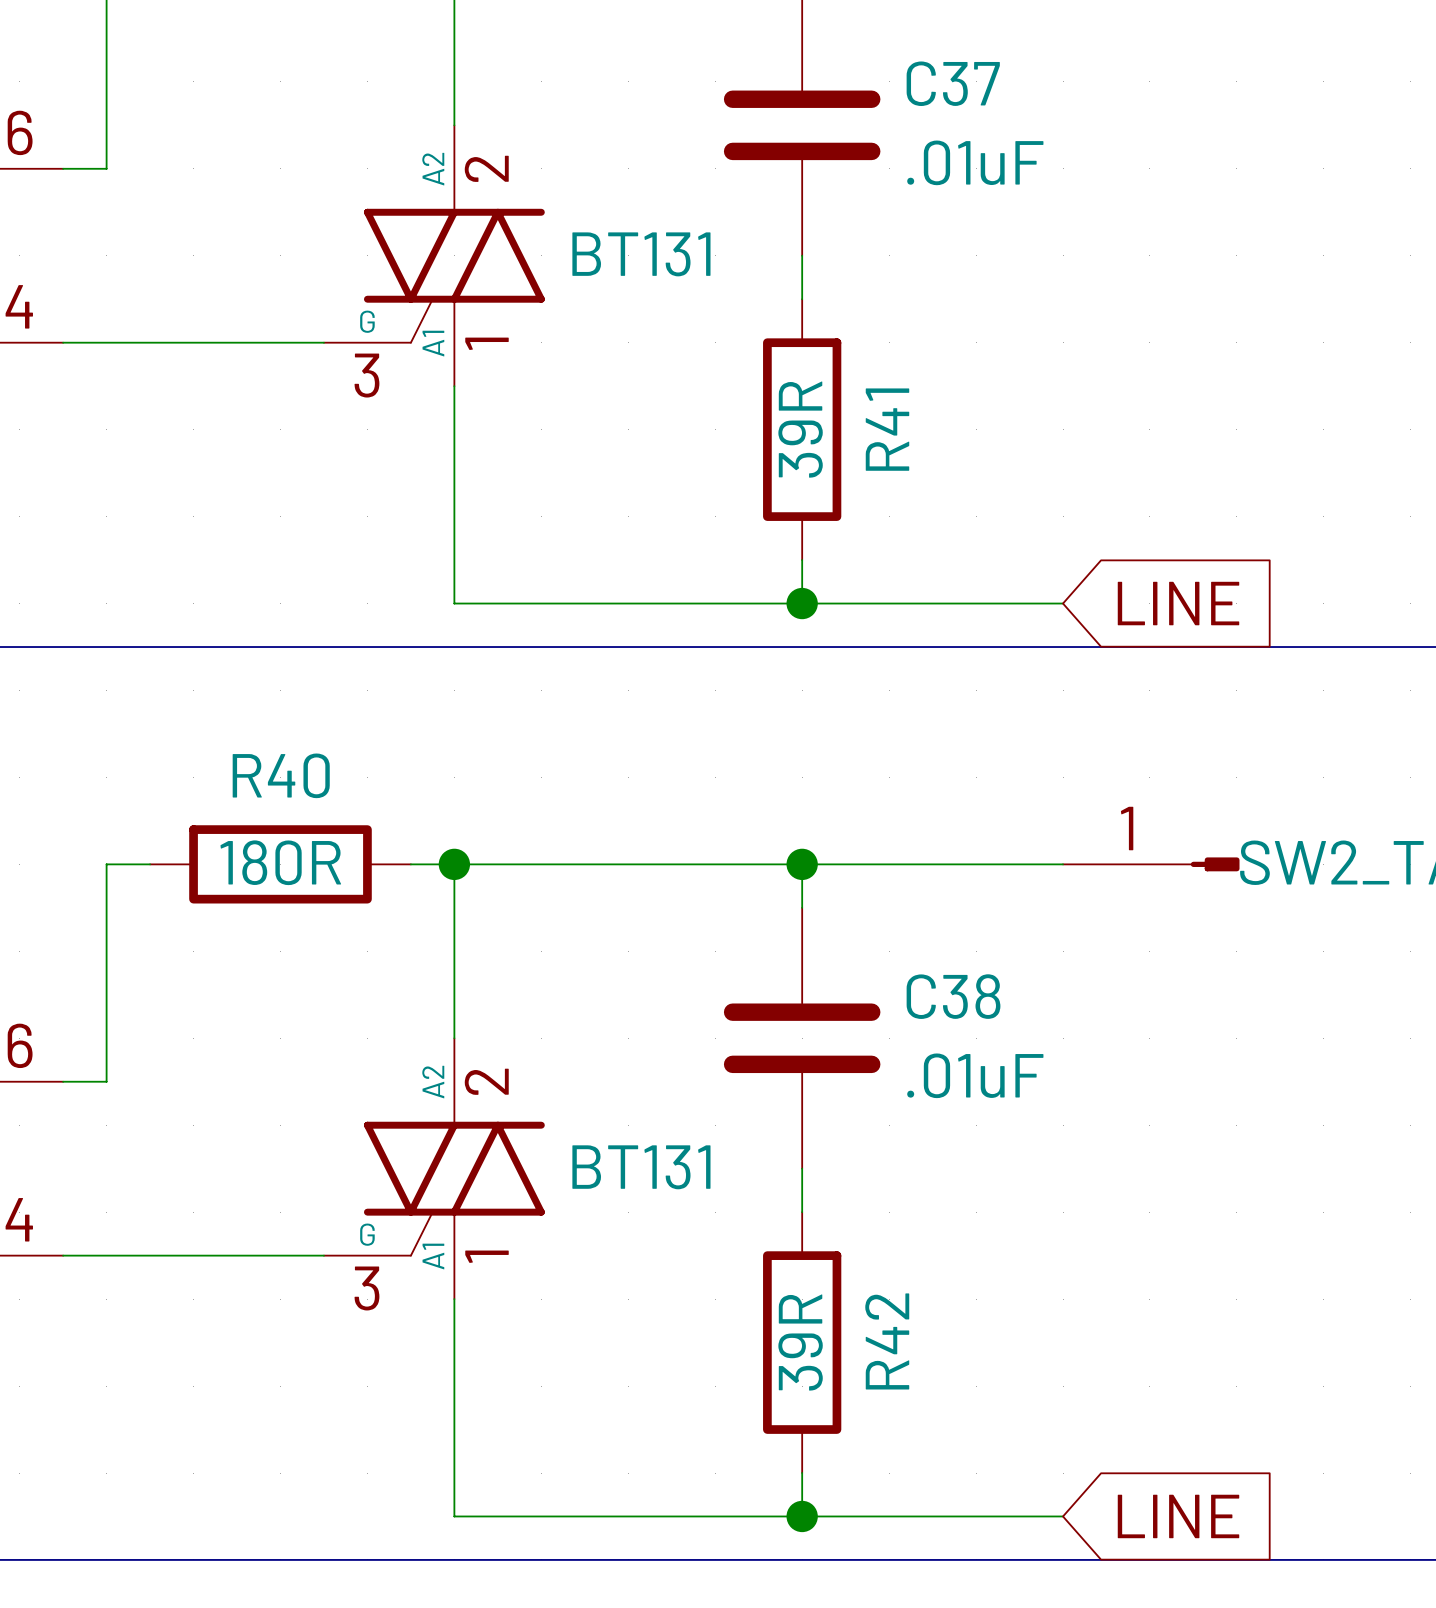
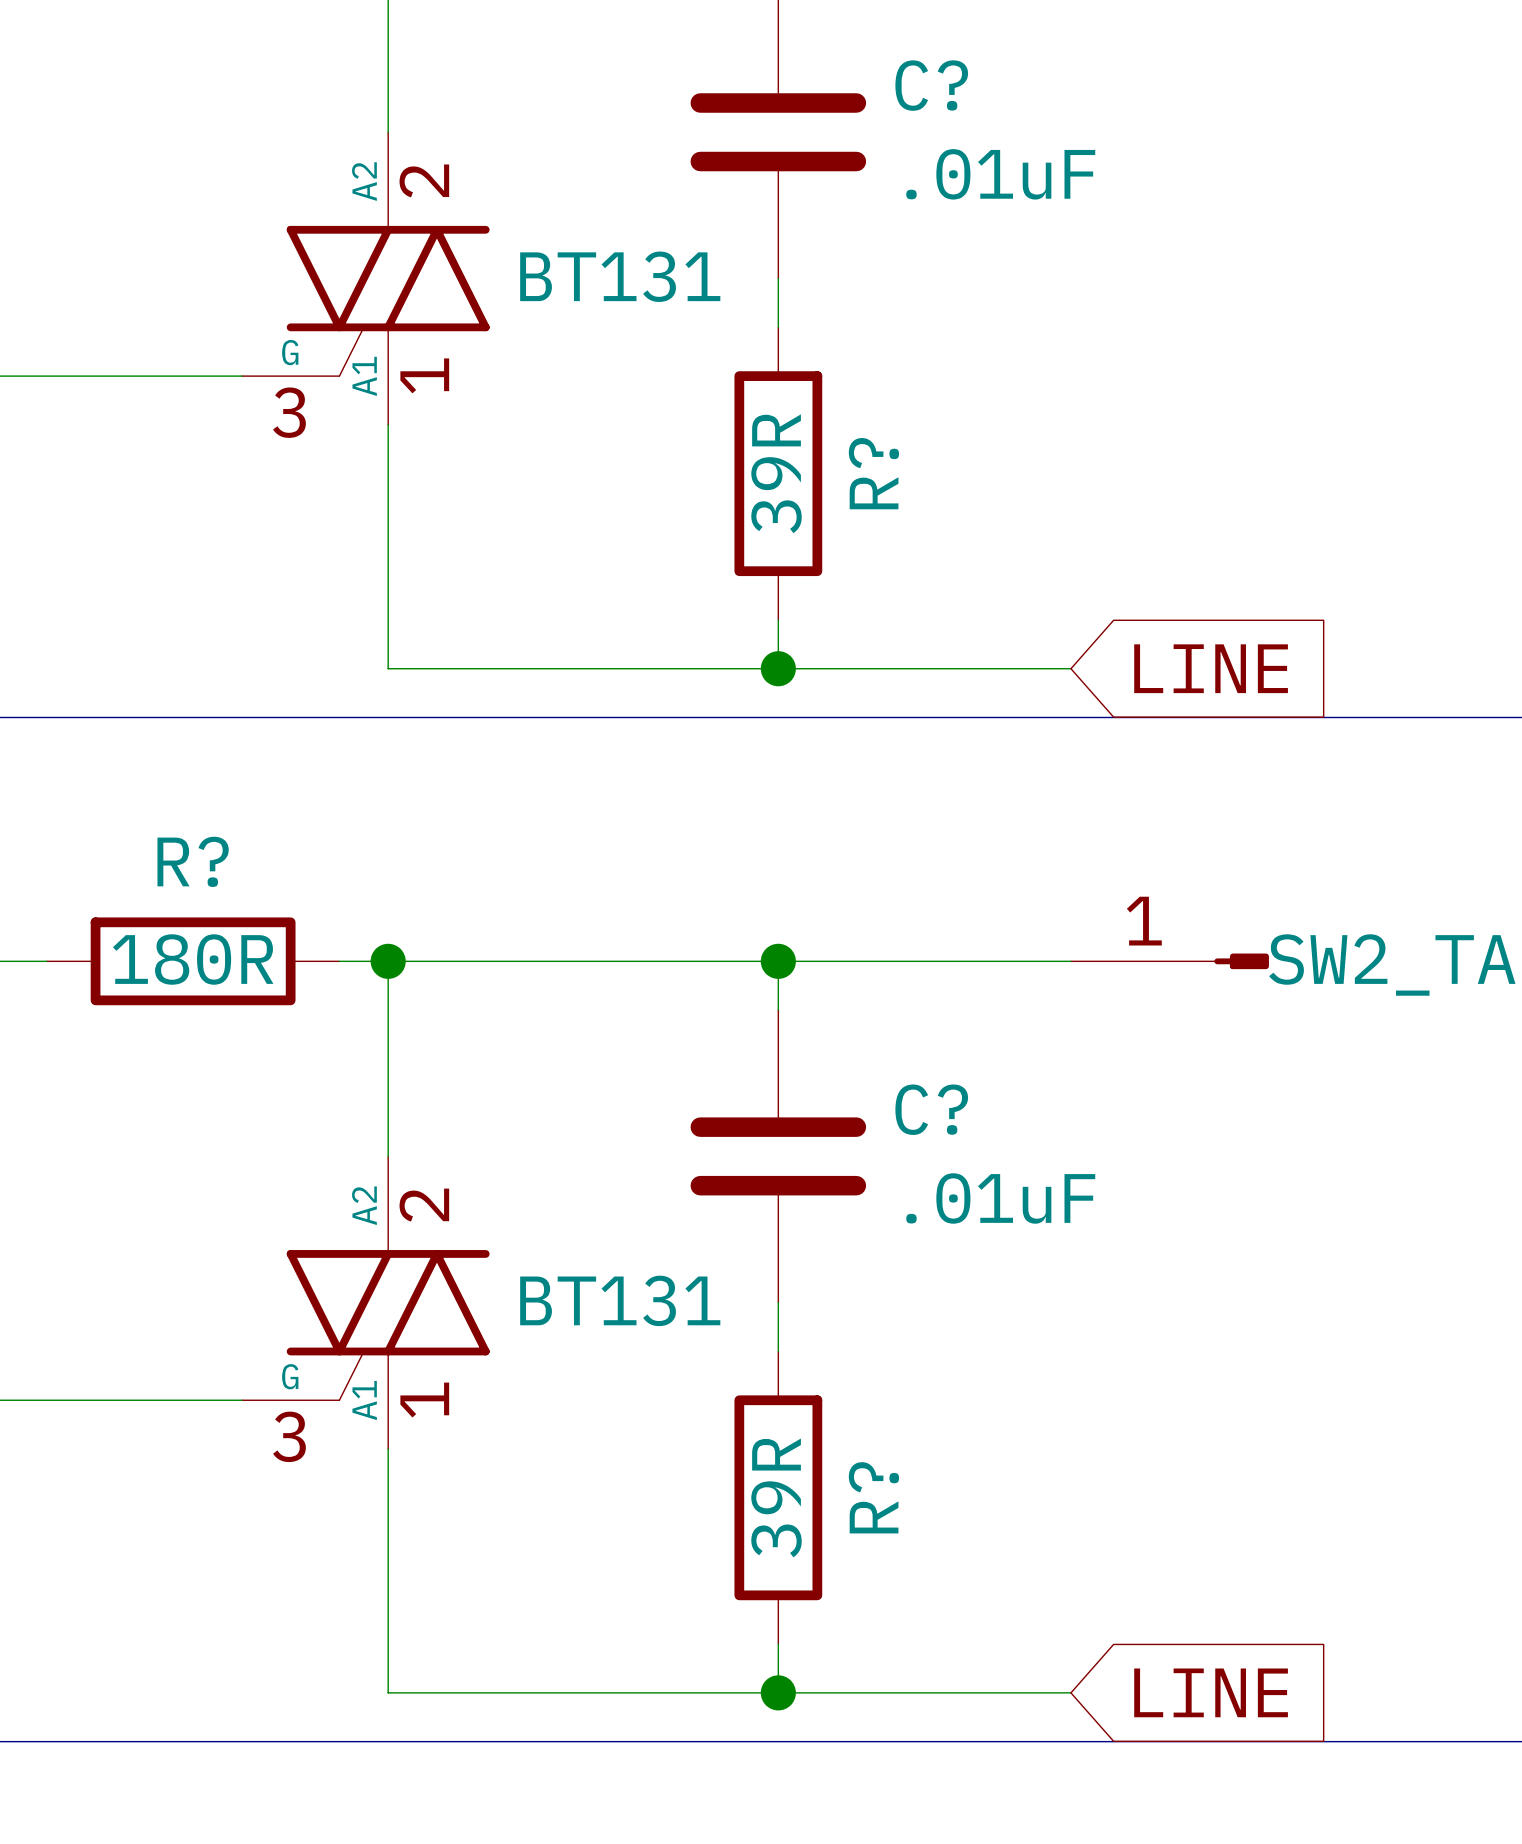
C37 name: C37 (953, 83) -> C? (931, 85)
R41 name: R41 (887, 429) -> R? (873, 473)
R40 name: R40 (281, 775) -> R? (193, 861)
C38 name: C38 (953, 996) -> C? (931, 1109)
R42 name: R42 (887, 1341) -> R? (873, 1497)

